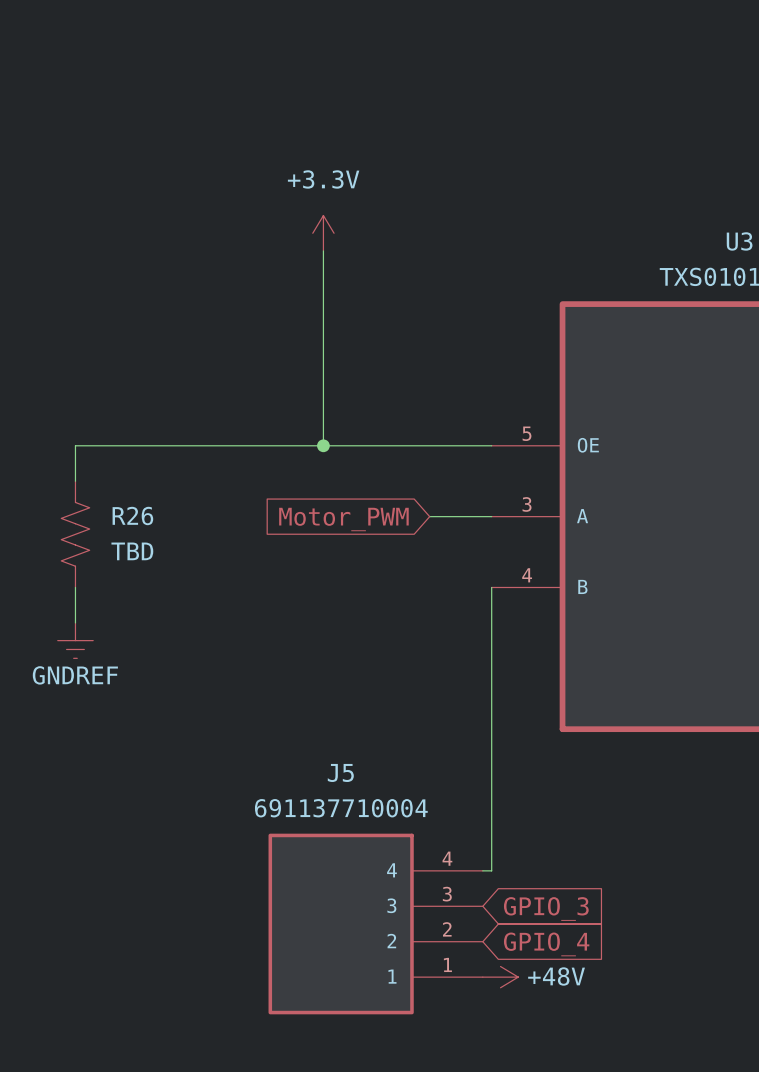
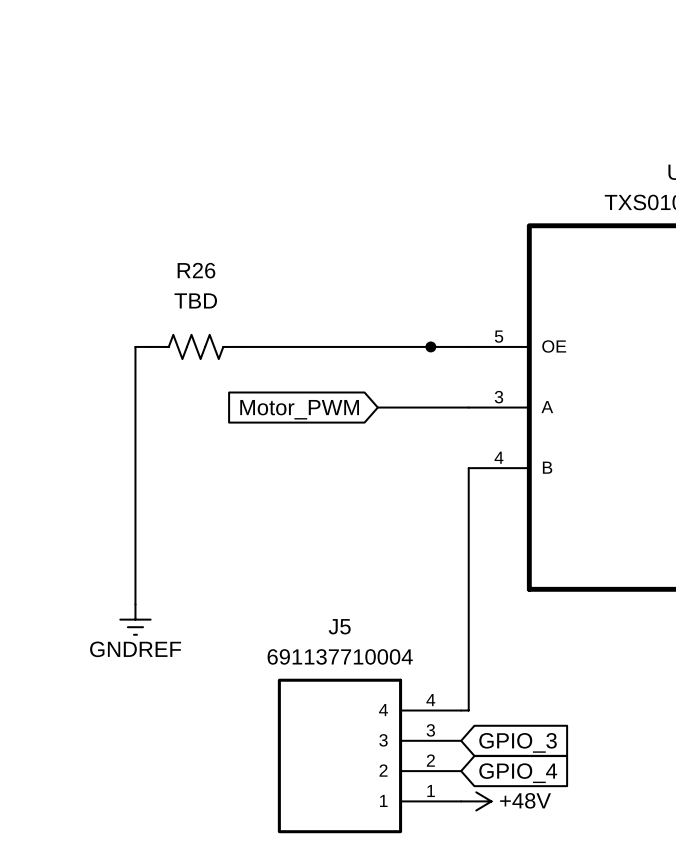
power symbol: +3.3V (323, 233) -> none
wire: (323, 250) (323, 445) -> none
wire: (102, 445) (75, 445) (75, 481) -> (135, 346) (135, 604)
wire: (119, 445) (226, 445) -> none
junction: (323, 445) -> none
junction: none -> (430, 346)
R26 name position: R26 (132, 515) -> R26 (196, 270)
wire: none -> (377, 407) (415, 407)
global label position: Motor_PWM (343, 519) -> Motor_PWM (299, 409)
R26 rotation: 0° (75, 534) -> 90° clockwise (196, 346)
R26 position: (75, 534) -> (196, 346)
R26 value position: TBD (132, 551) -> TBD (195, 300)
wire: (75, 587) (75, 622) -> none
power symbol position: GNDREF (75, 640) -> GNDREF (135, 619)

